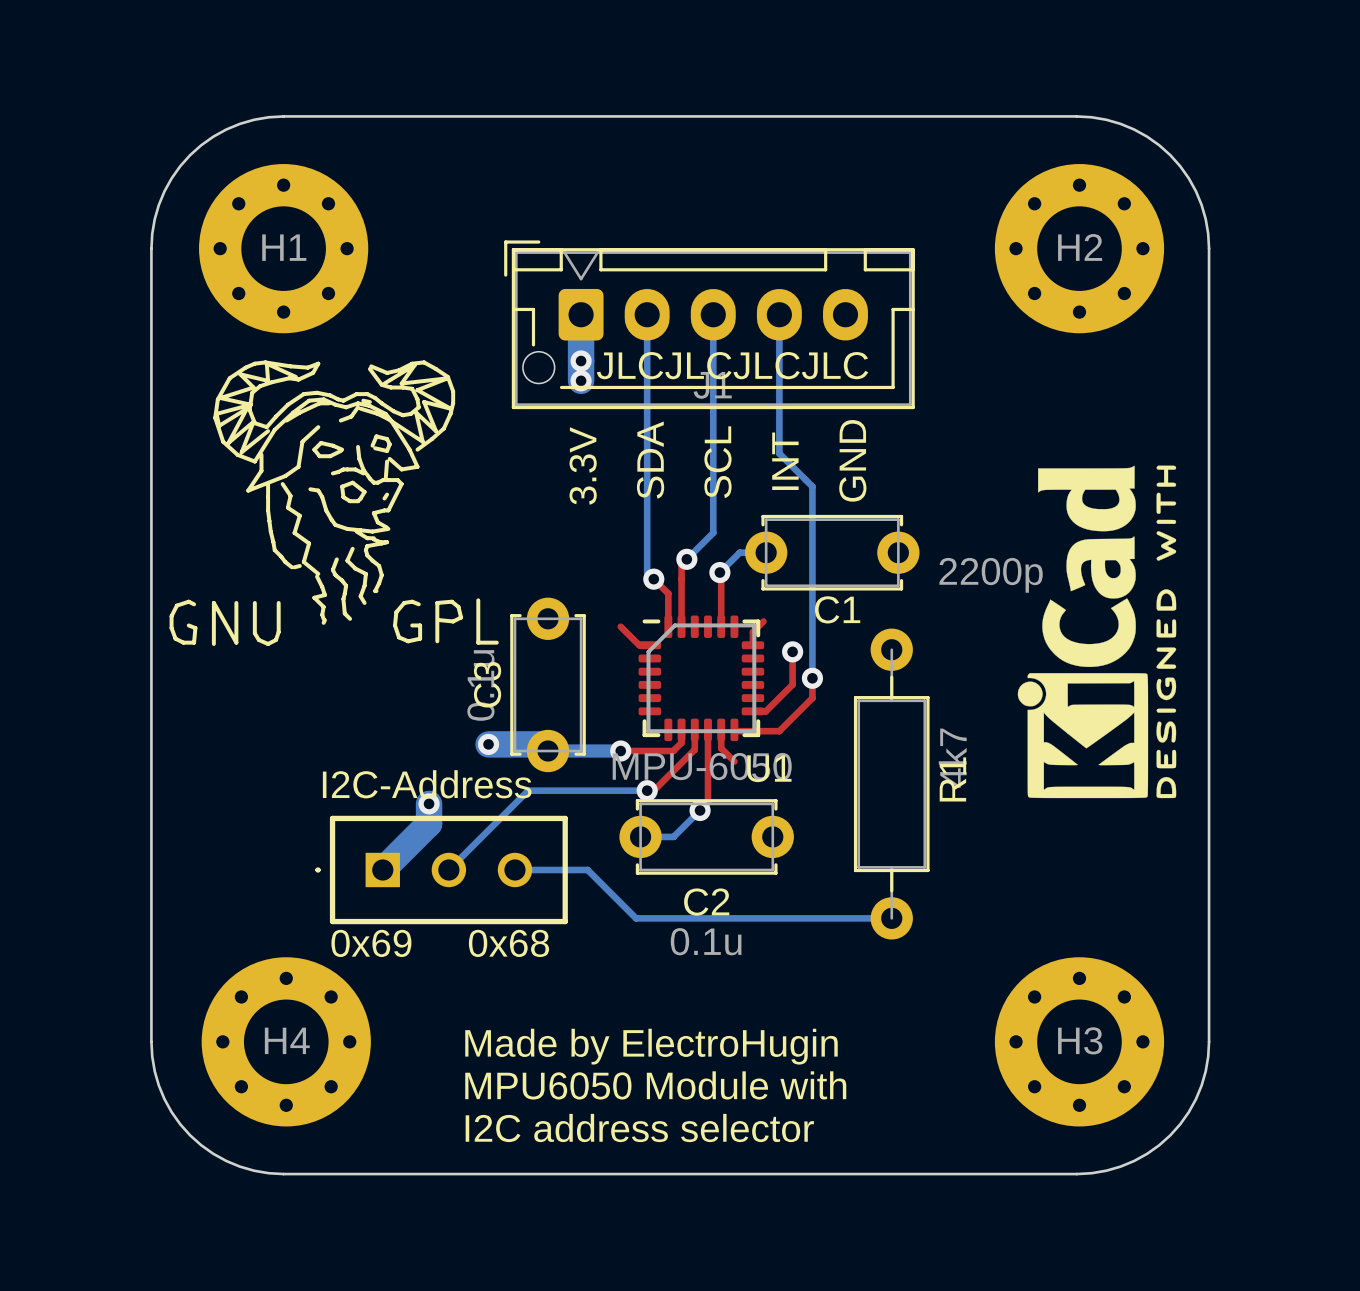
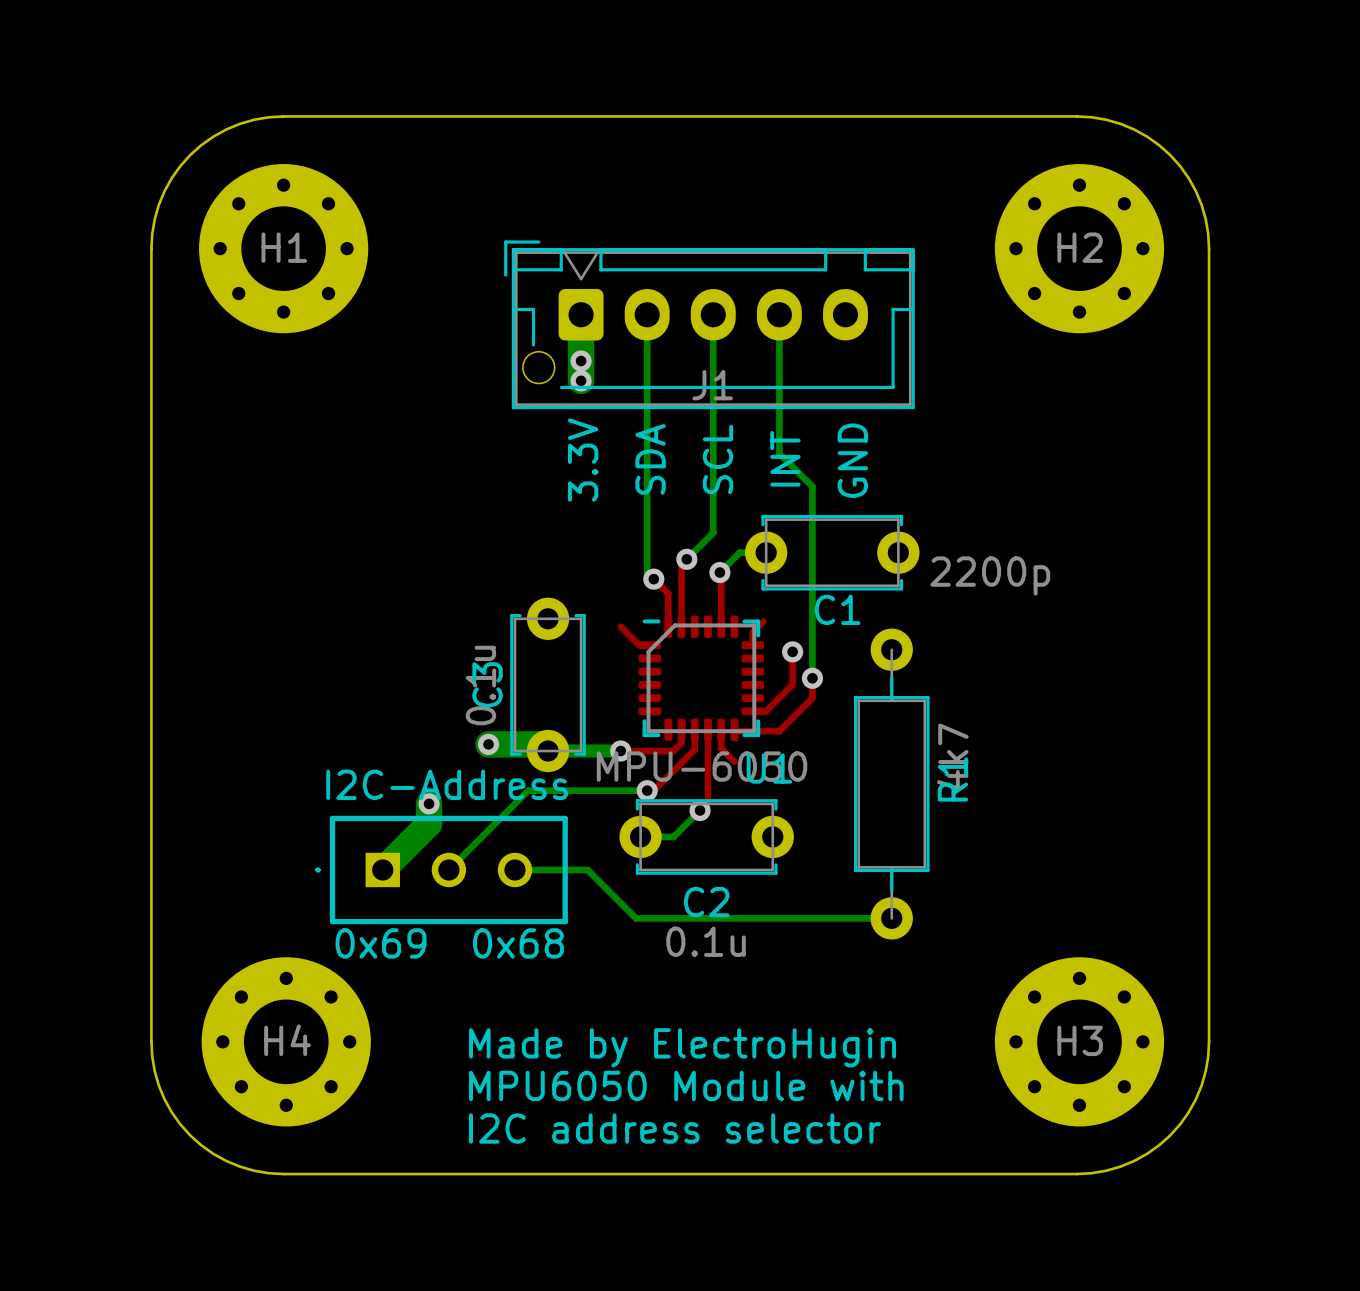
drawing: [169, 360, 499, 646] -> none
text: JLCJLCJLCJLC (732, 365) -> none
drawing: [1017, 465, 1177, 799] -> none

